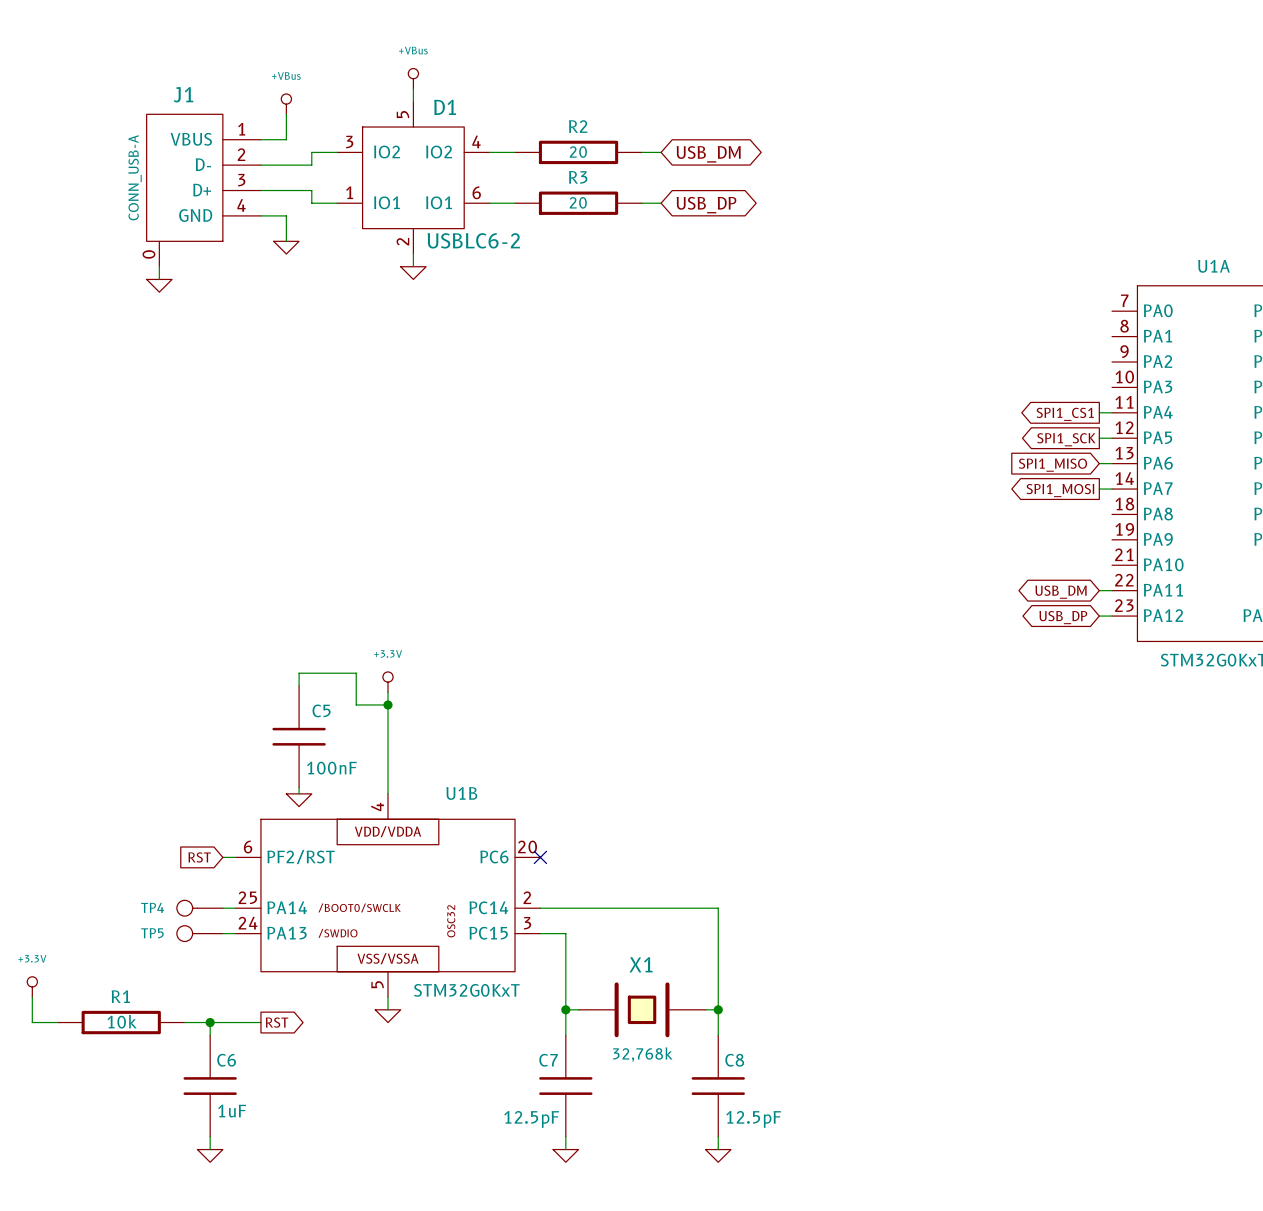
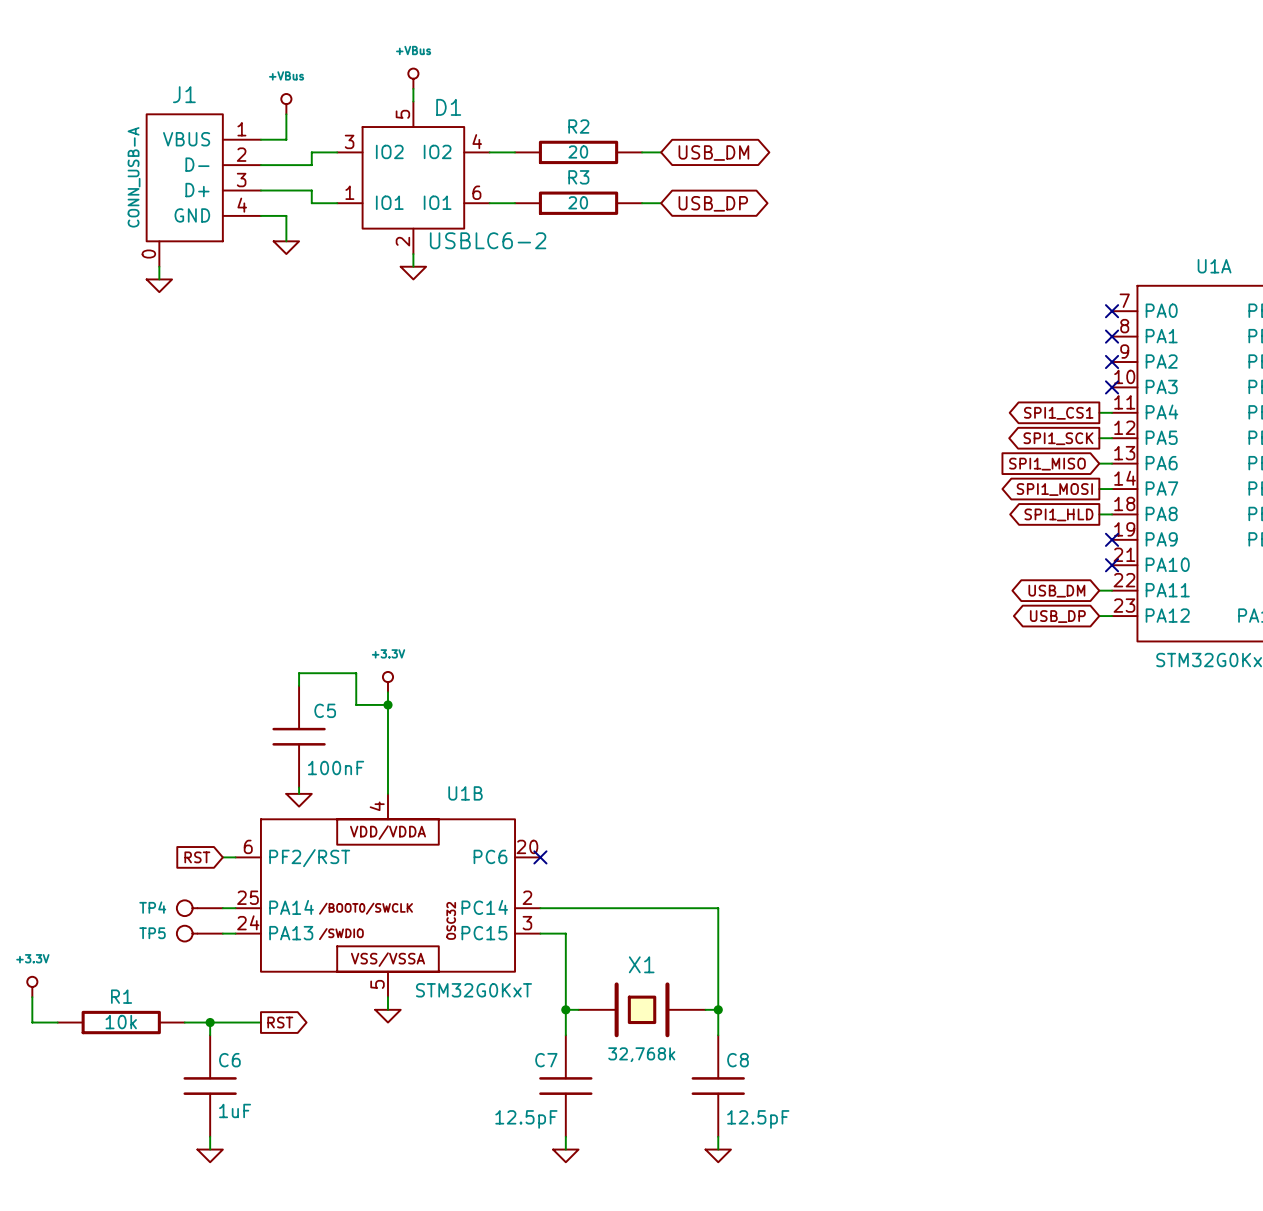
no-connect mark: none -> (1112, 311)
no-connect mark: none -> (1112, 336)
no-connect mark: none -> (1112, 362)
no-connect mark: none -> (1112, 387)
wire: none -> (1099, 514) (1112, 514)
global label: none -> SPI1_HLD (1058, 514)
no-connect mark: none -> (1112, 539)
no-connect mark: none -> (1112, 565)

